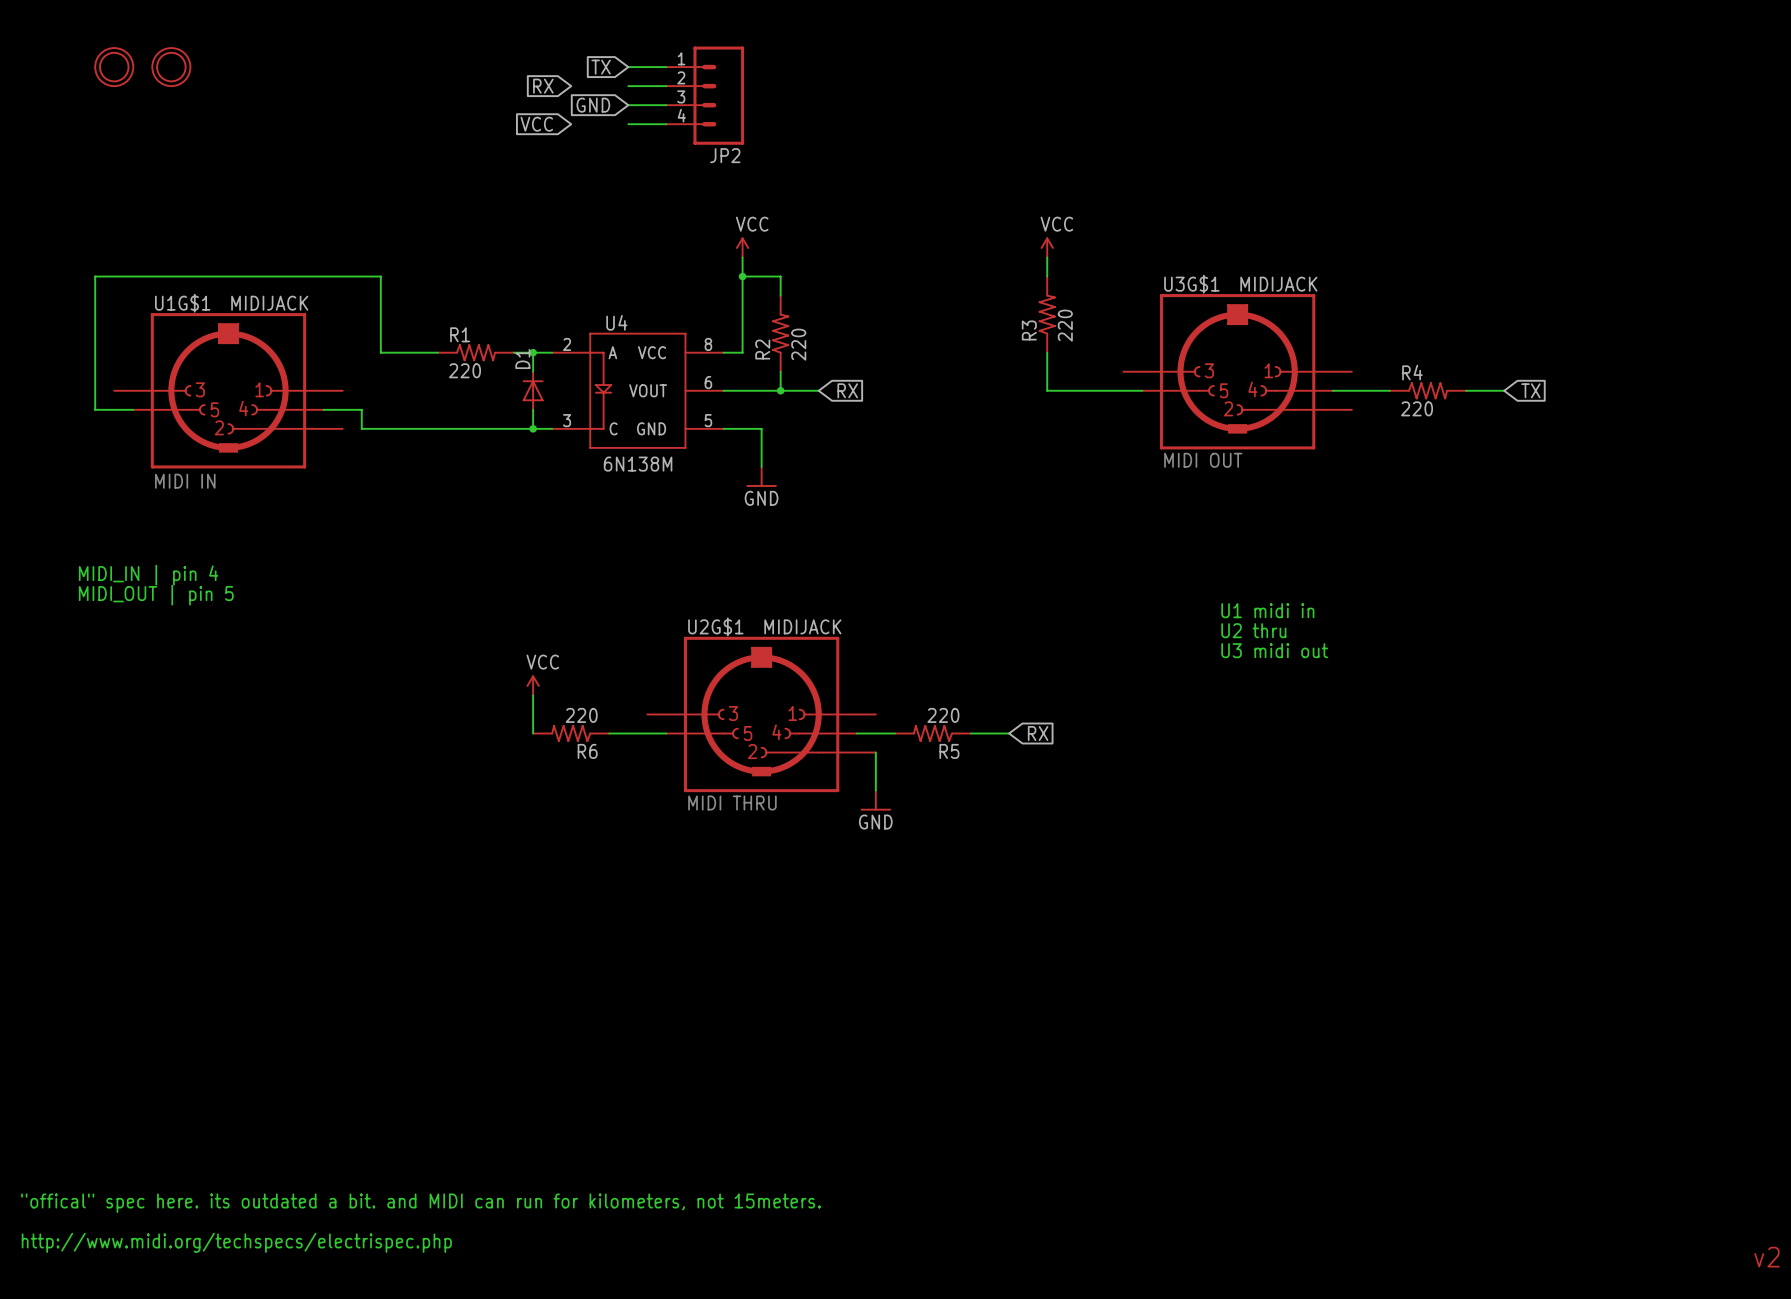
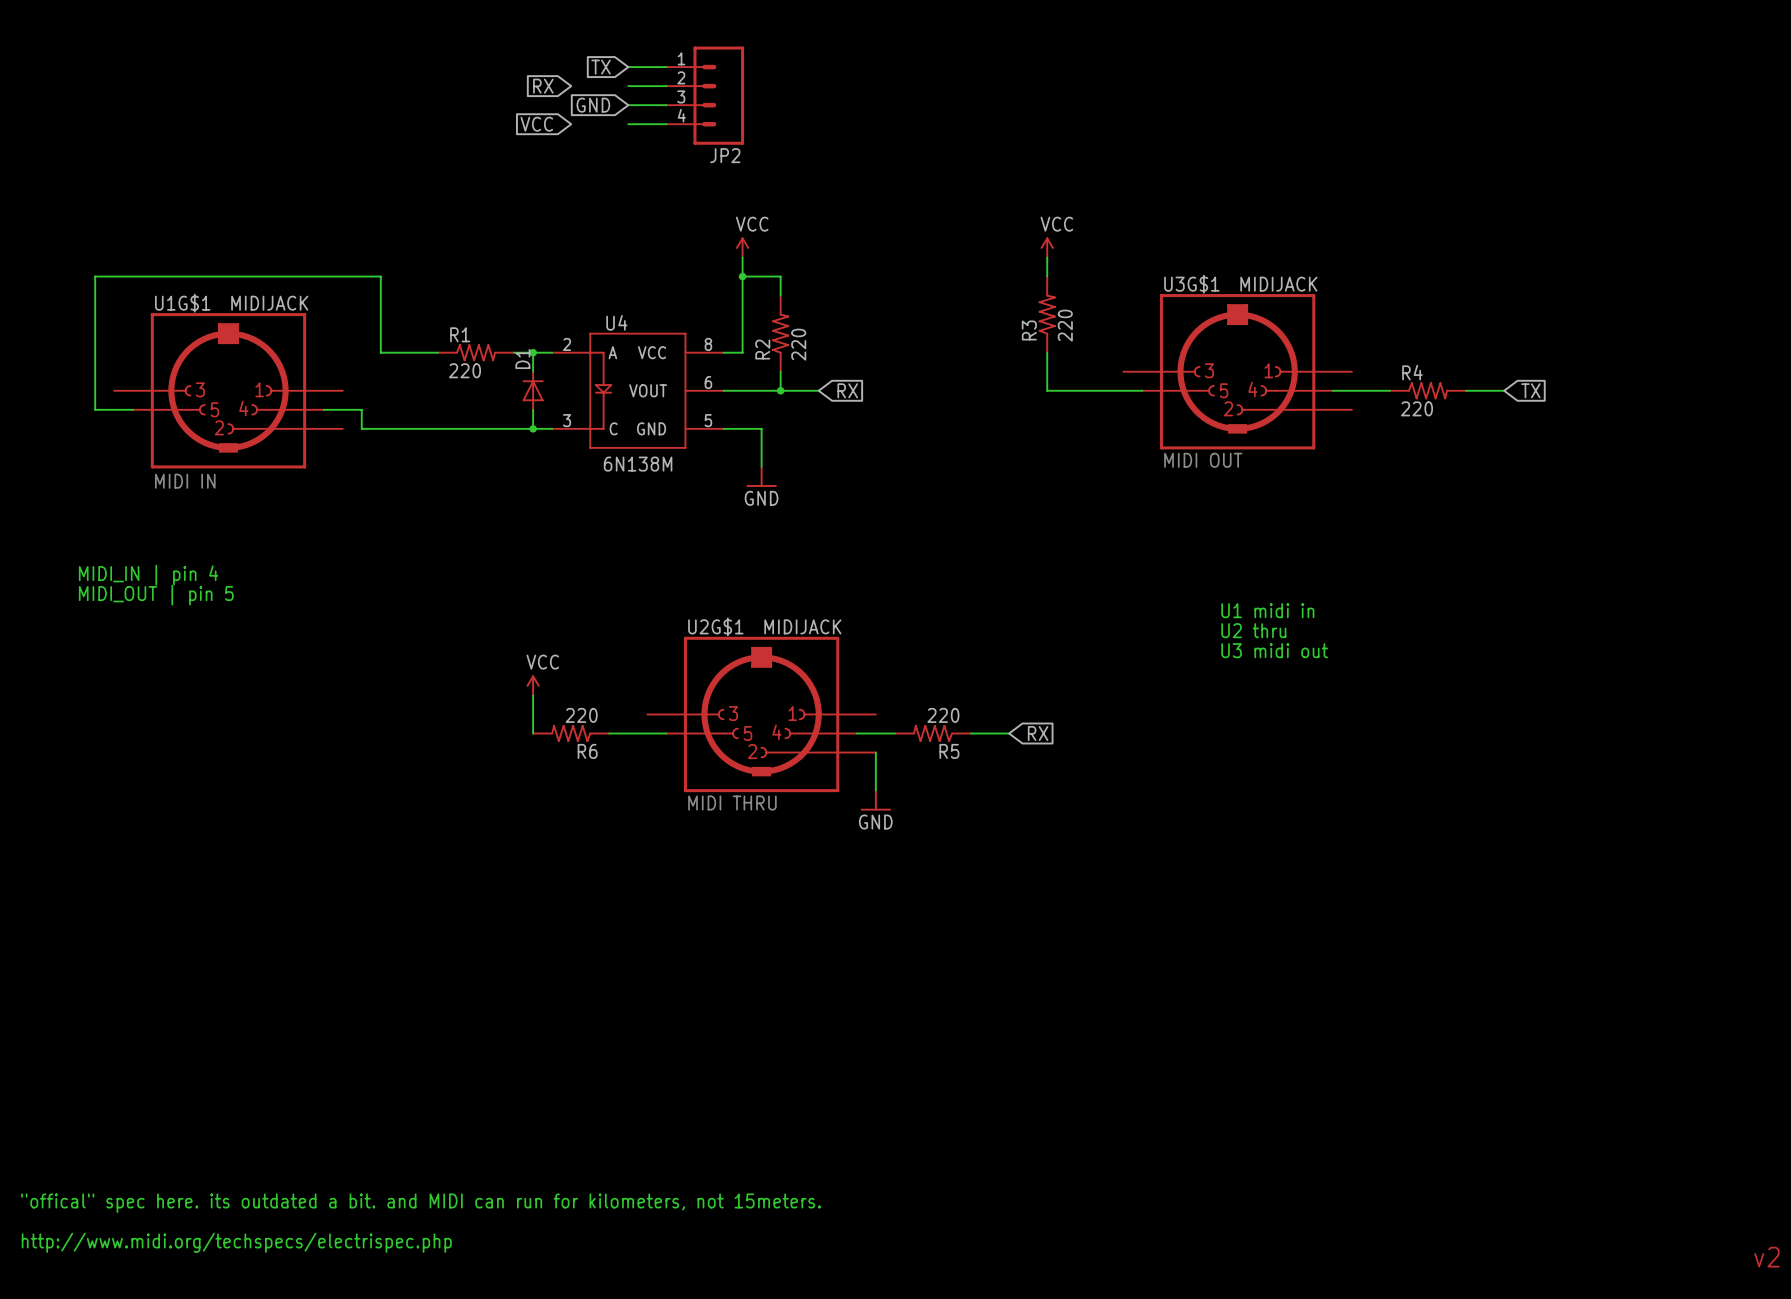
part: (114, 67) -> none
part: (171, 67) -> none

